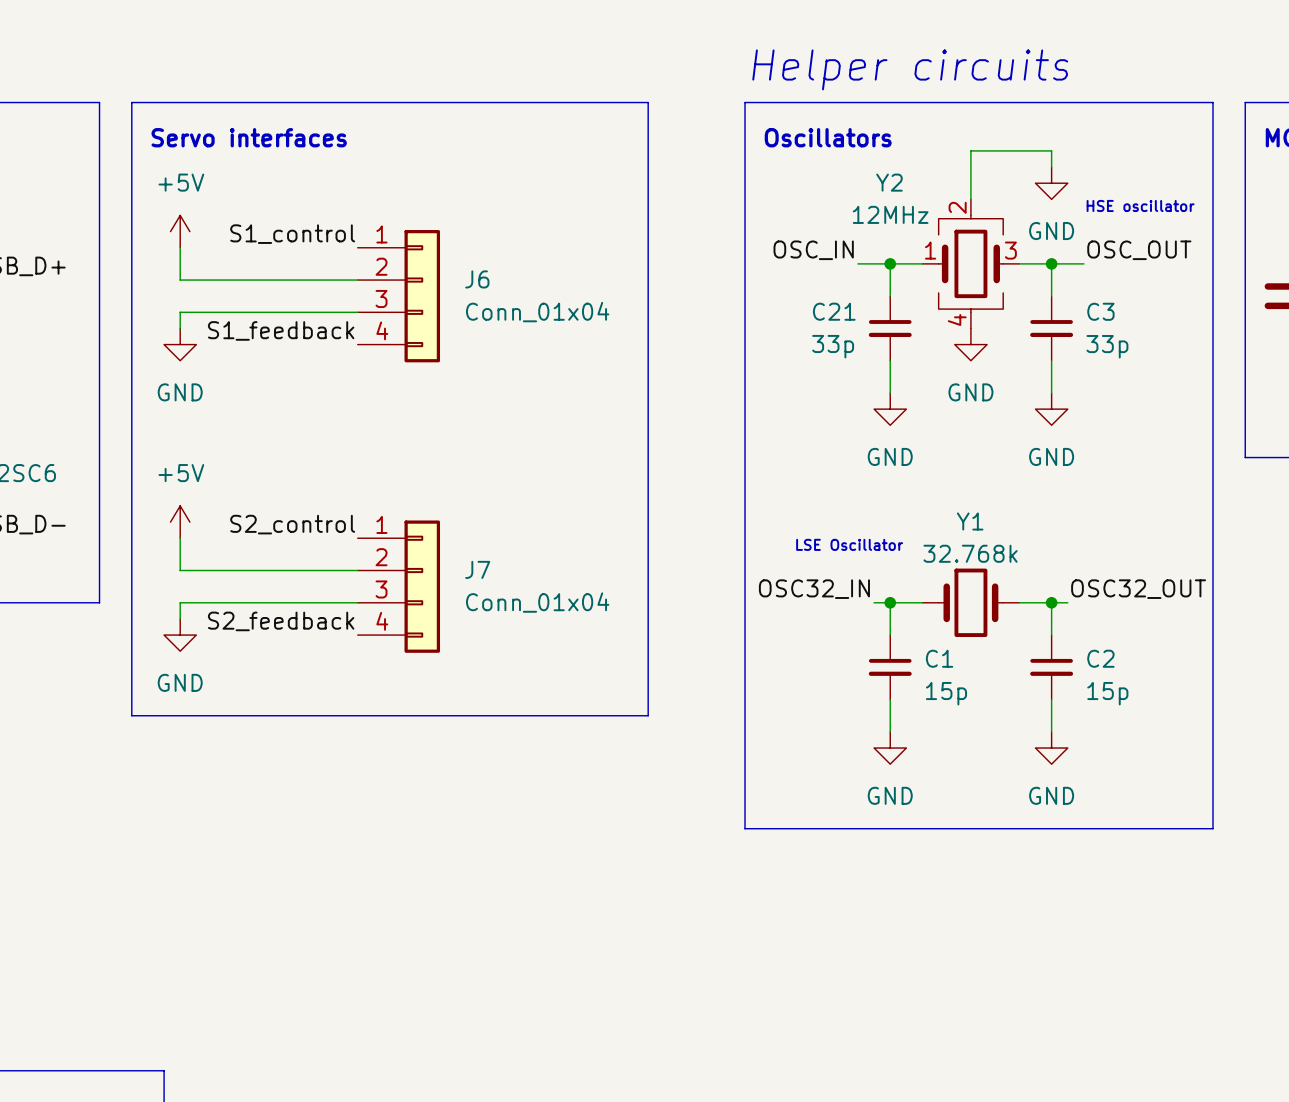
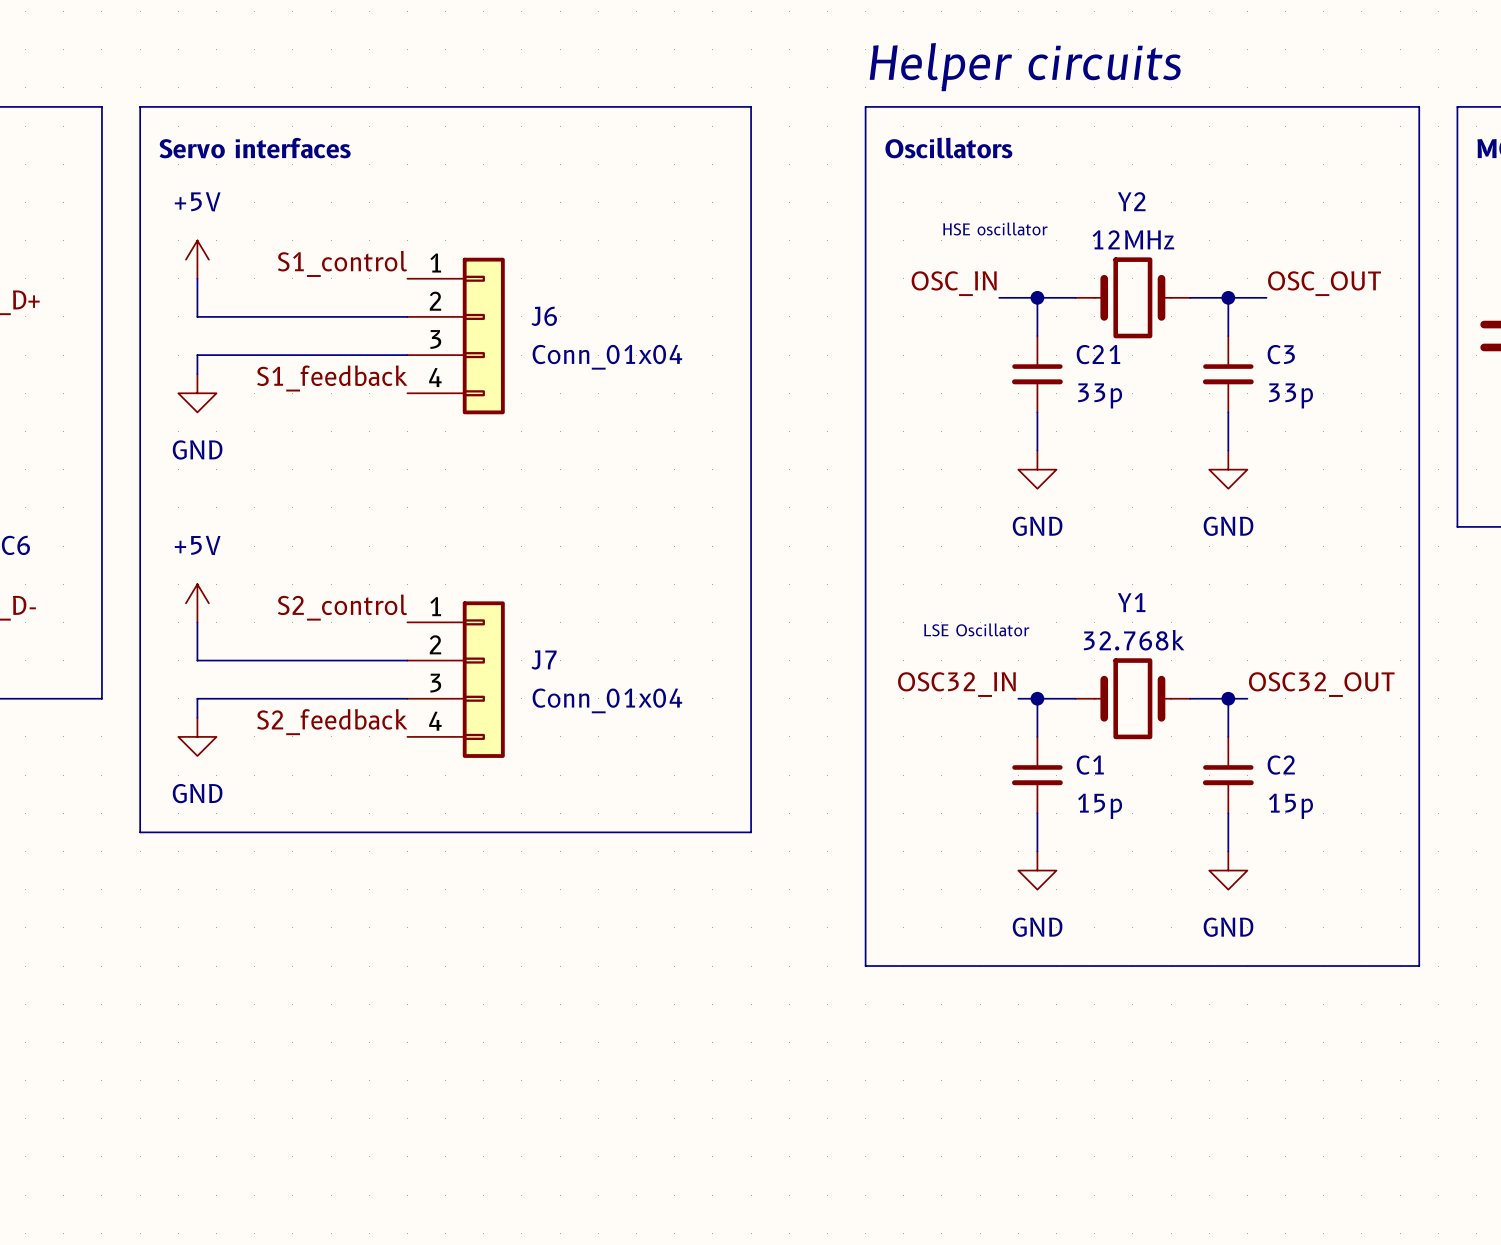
wire: (1051, 167) (1051, 150) (970, 150) (970, 199) -> none
Y2 name position: Y2 (889, 182) -> Y2 (1131, 201)
power symbol: GND (1051, 183) -> none
Y2 symbol: [922, 199, 1020, 329] -> [1075, 257, 1191, 339]
text position: HSE oscillator (1140, 205) -> HSE oscillator (995, 228)
Y2 value position: 12MHz (890, 214) -> 12MHz (1133, 239)
C21 name position: C21 (834, 311) -> C21 (1098, 354)
power symbol: GND (970, 344) -> none
C21 value position: 33p (833, 346) -> 33p (1100, 395)

